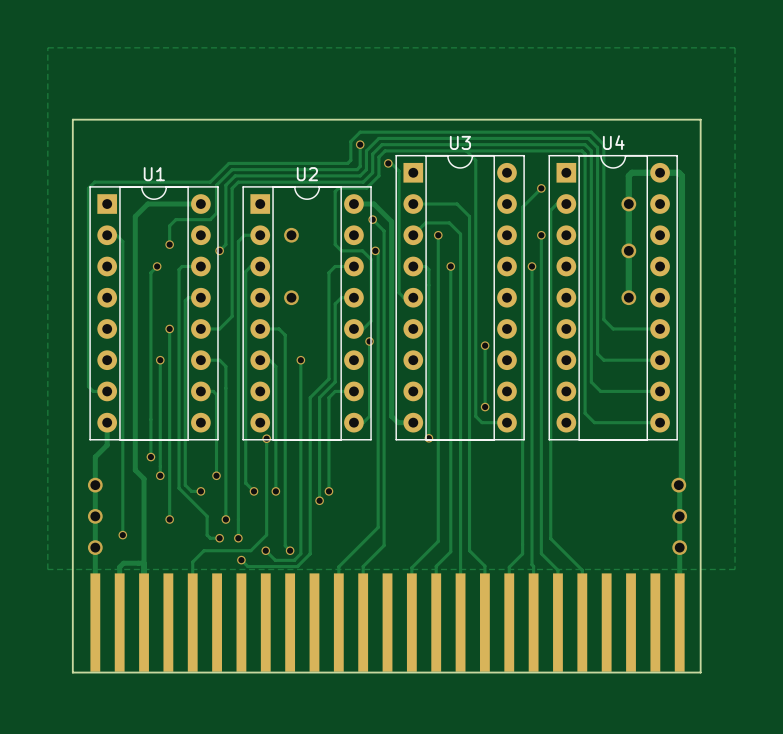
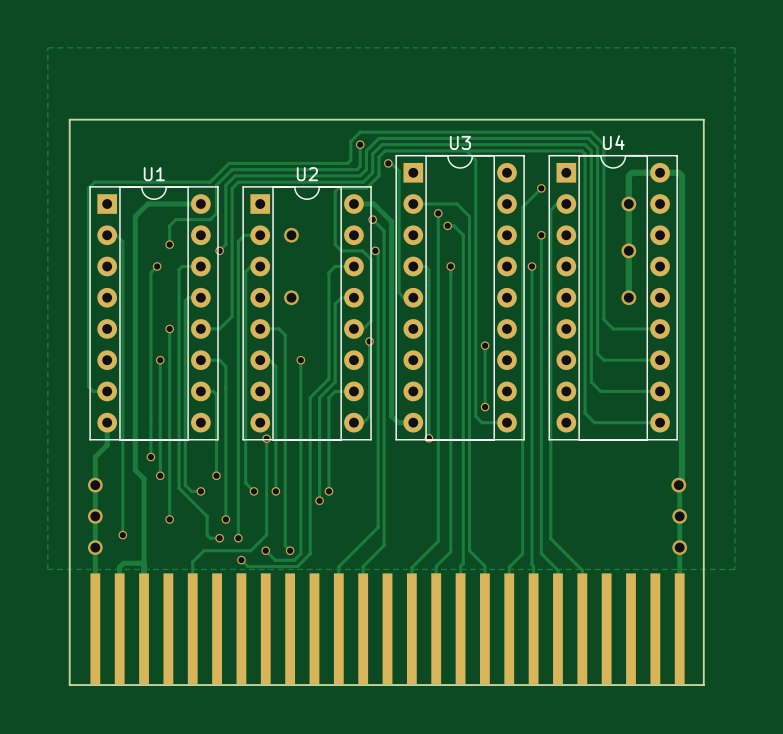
board edge: (72, 119) (72, 672) (700, 672) (700, 119) -> (72, 119) (69, 119) (69, 685) (703, 685) (703, 119) (700, 119)
track: none -> (438, 213) (438, 235)
via: none -> (438, 213)
via: none -> (447, 225)
track: (413, 235) (425, 222) (449, 222) (460, 234) (460, 566) -> (447, 225) (453, 225) (463, 235) (463, 563) (460, 566)
via: (438, 235) -> none
part footprint: [90, 573, 685, 672] -> [90, 573, 685, 685]

